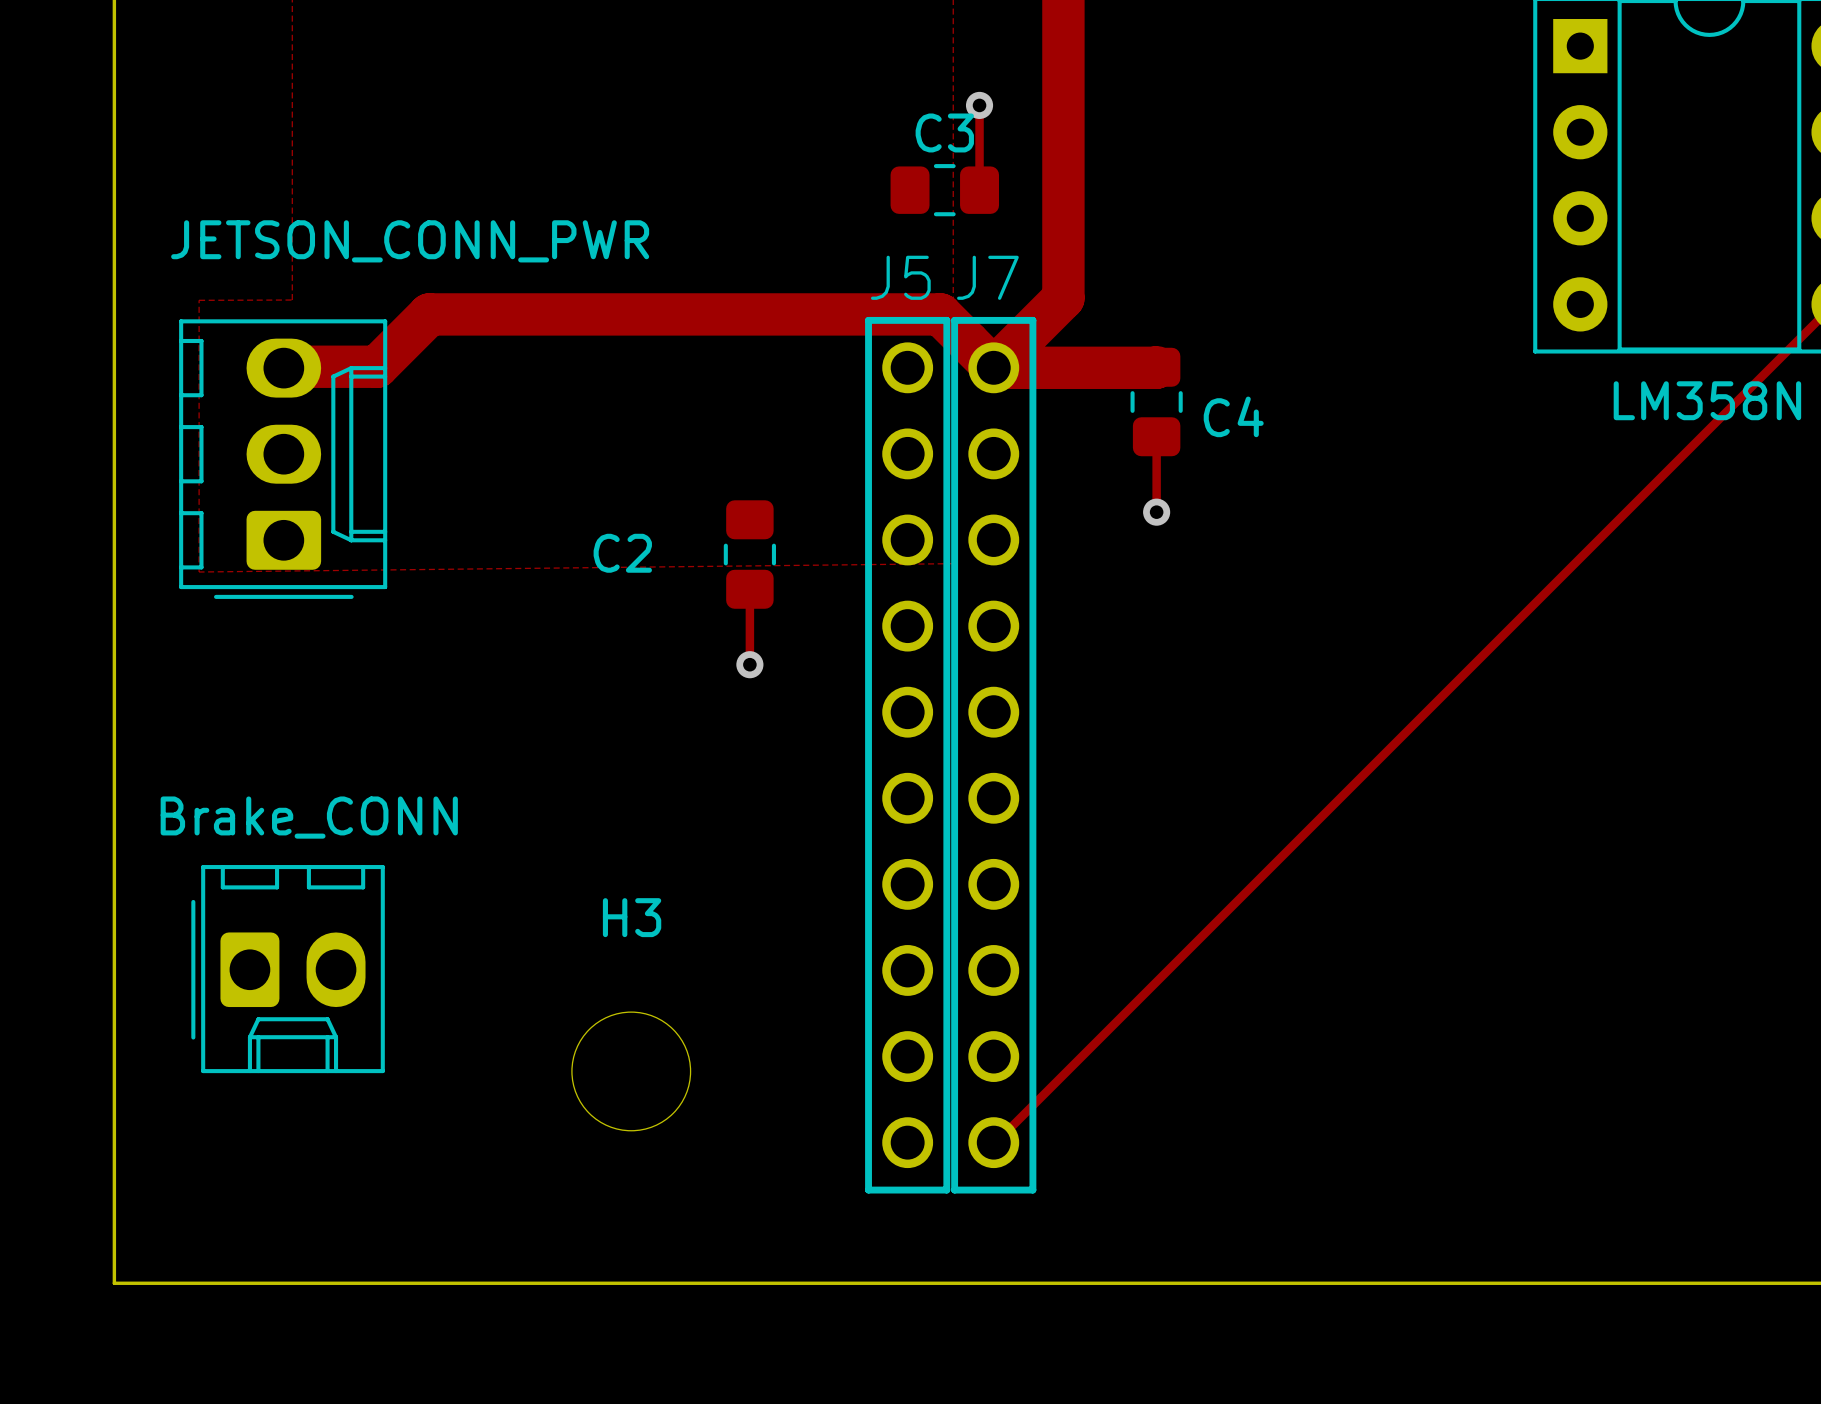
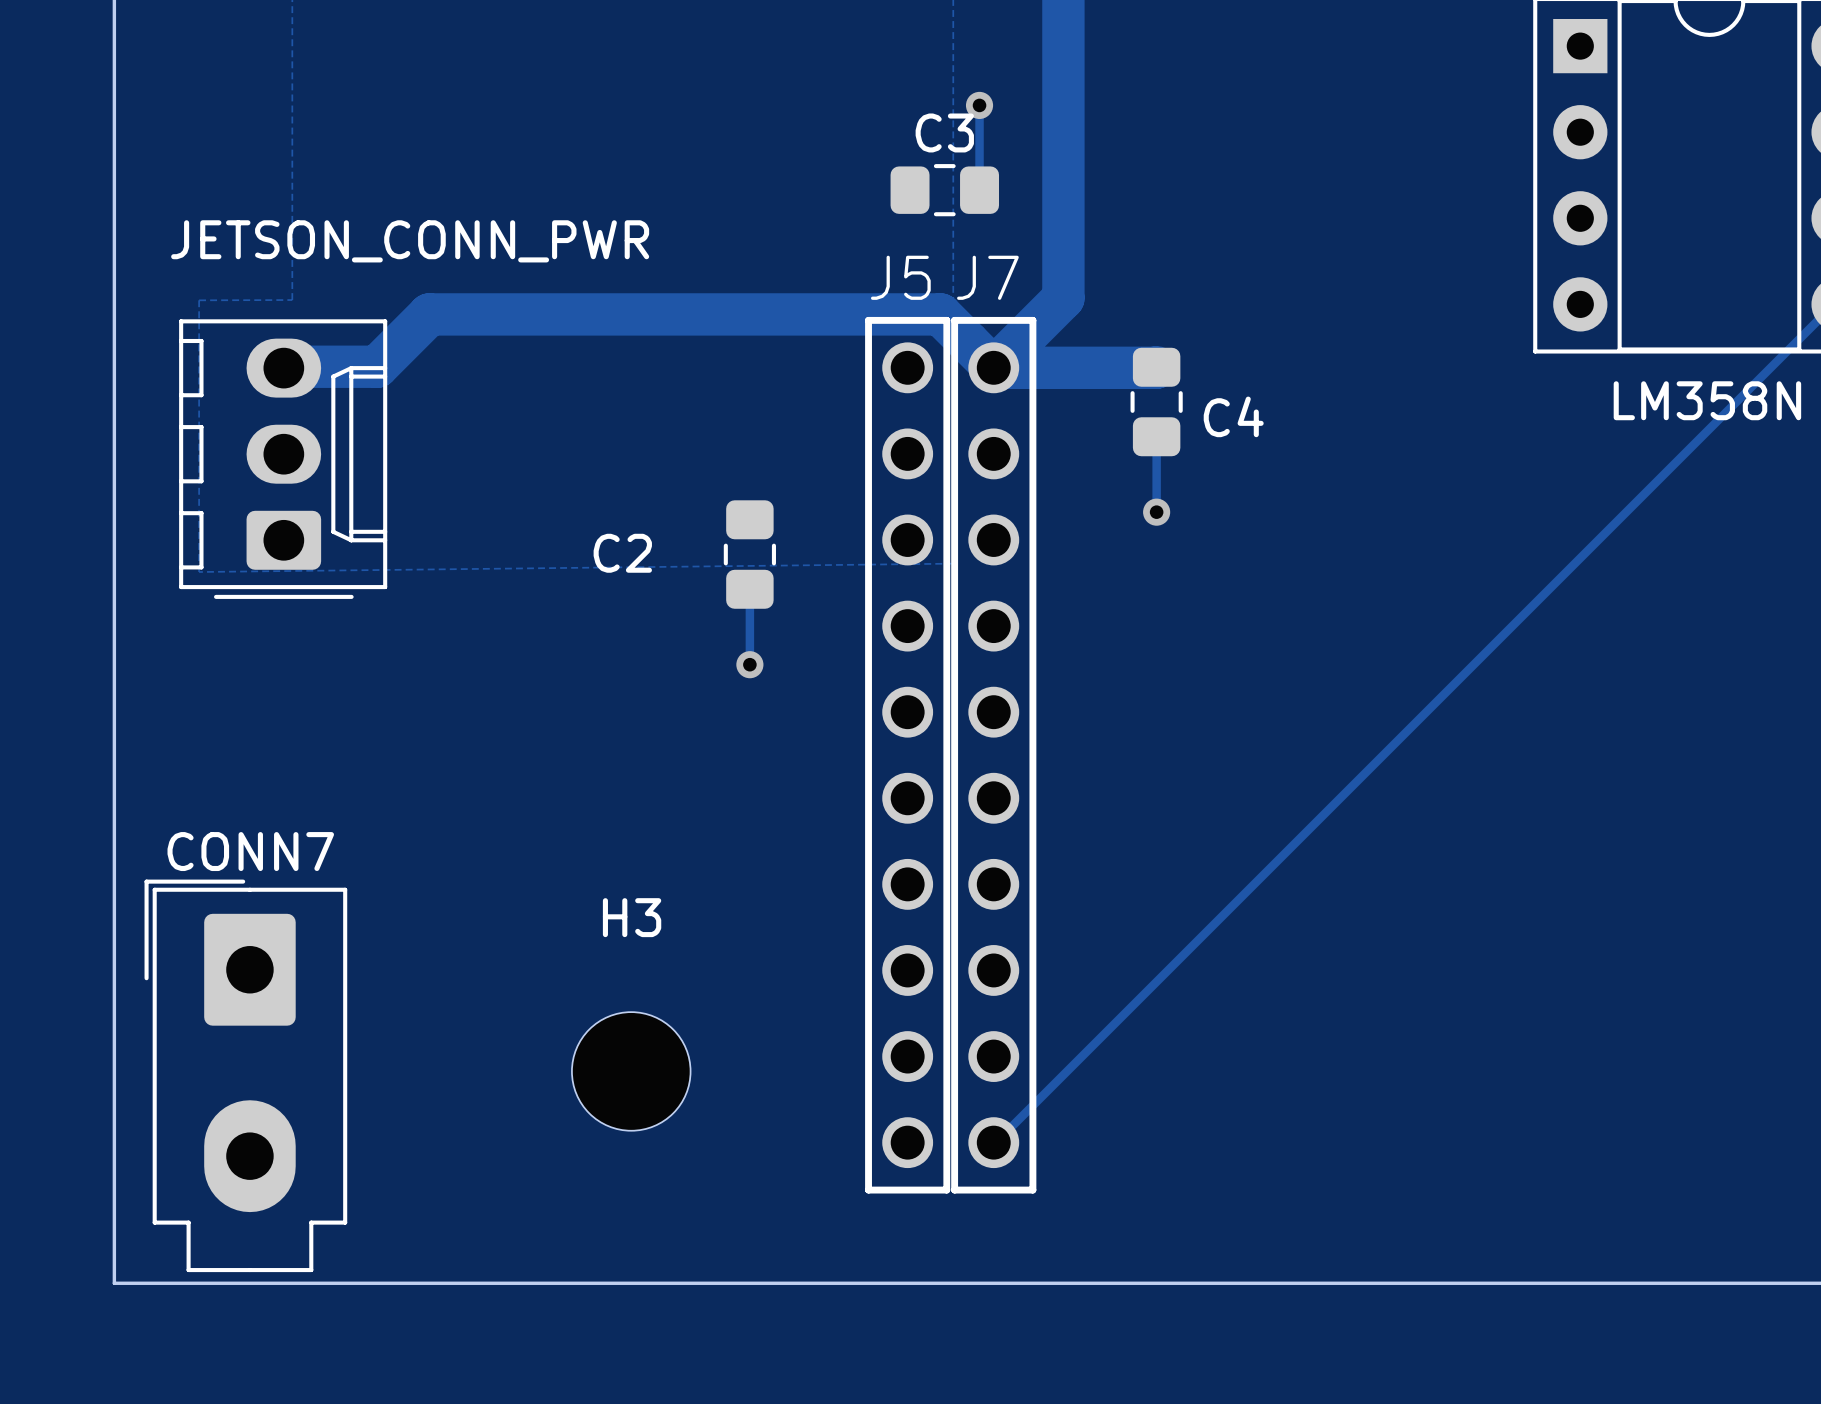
part: Brake_CONN (288, 969) -> none
CONN7: none -> (245, 1075)

